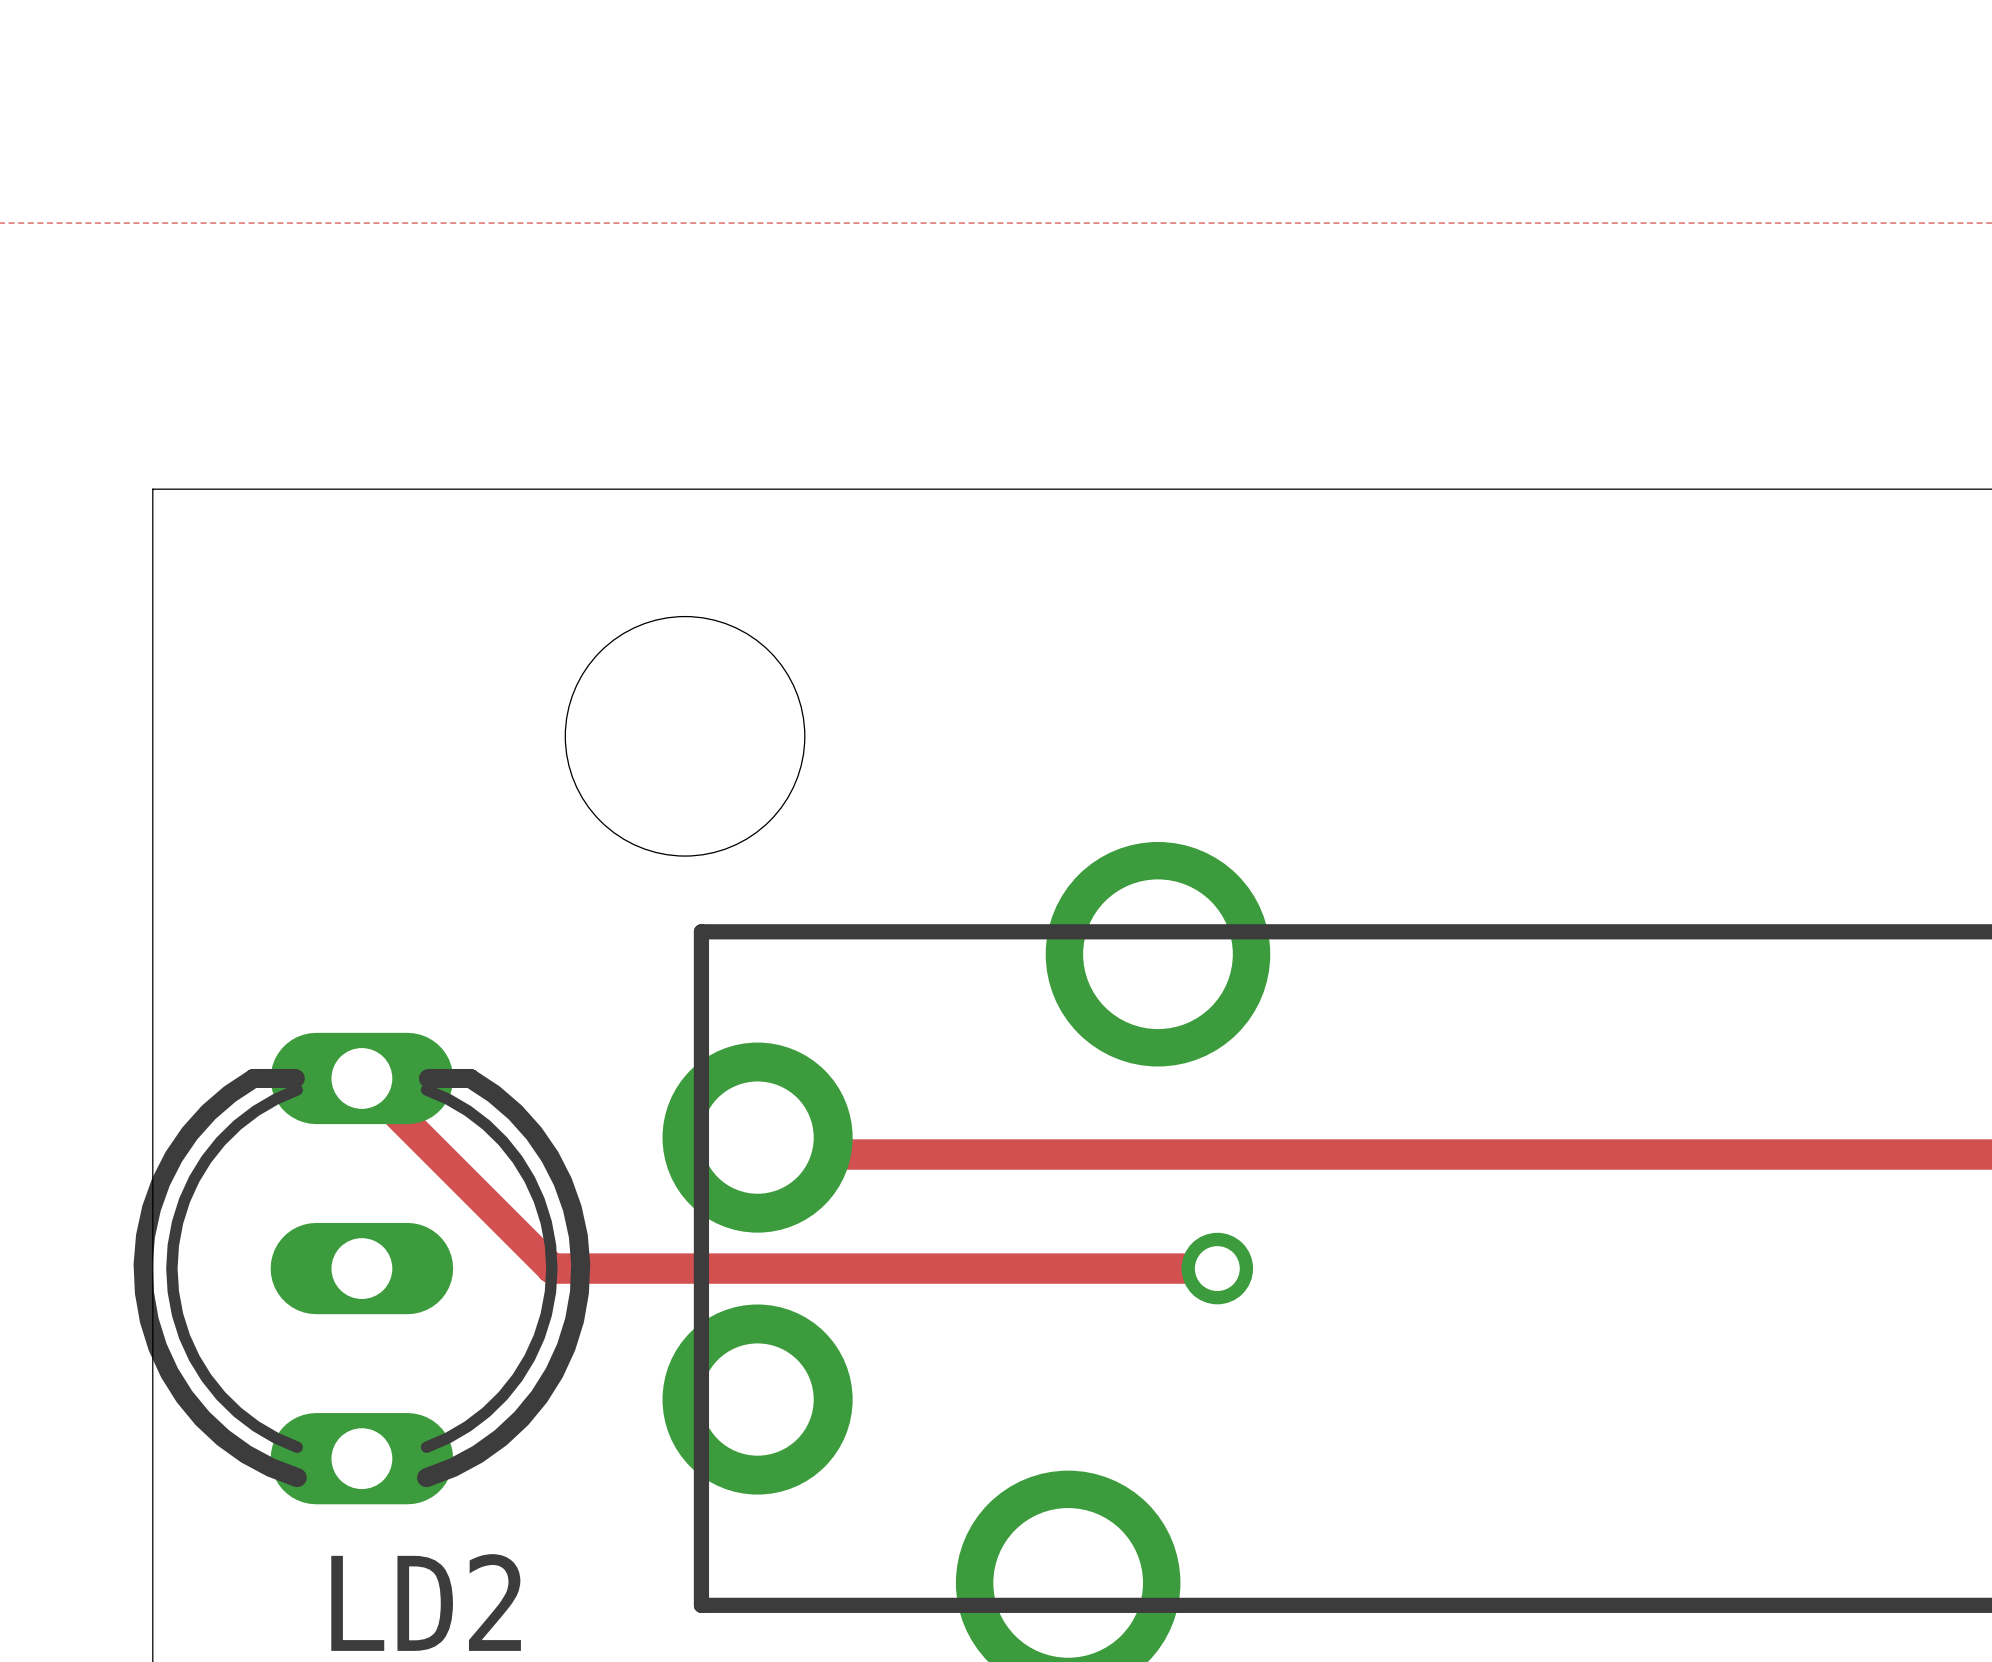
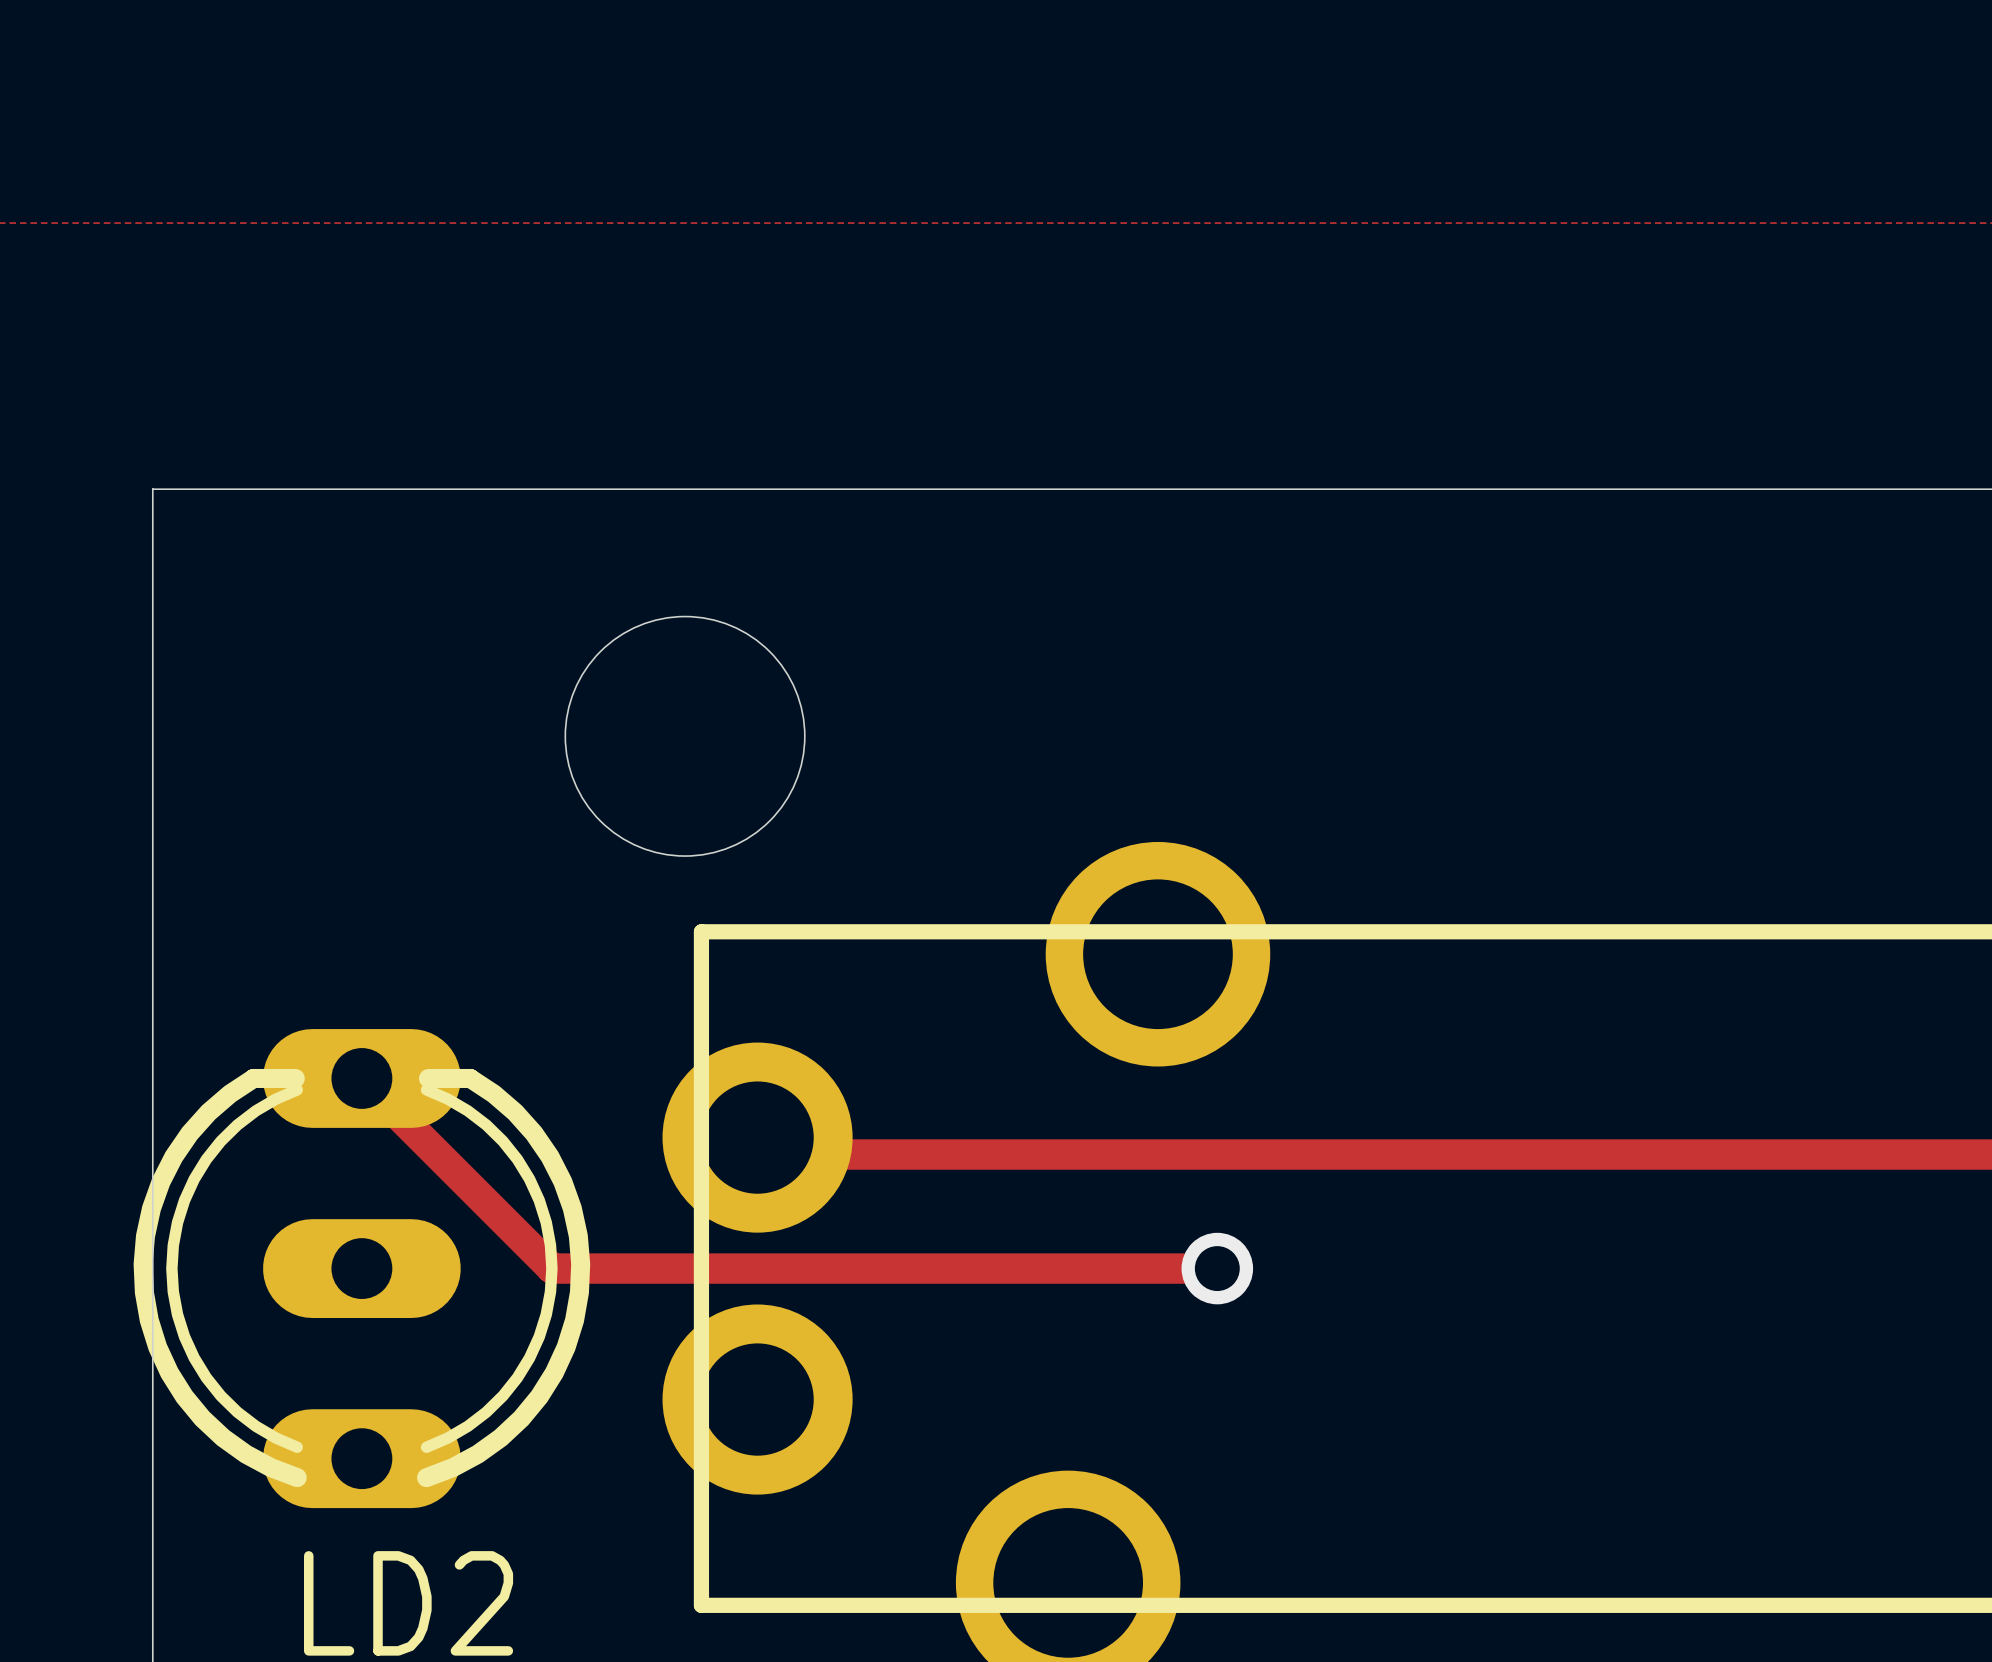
LD2 footprint: [133, 1032, 591, 1505] -> [133, 1029, 591, 1509]

